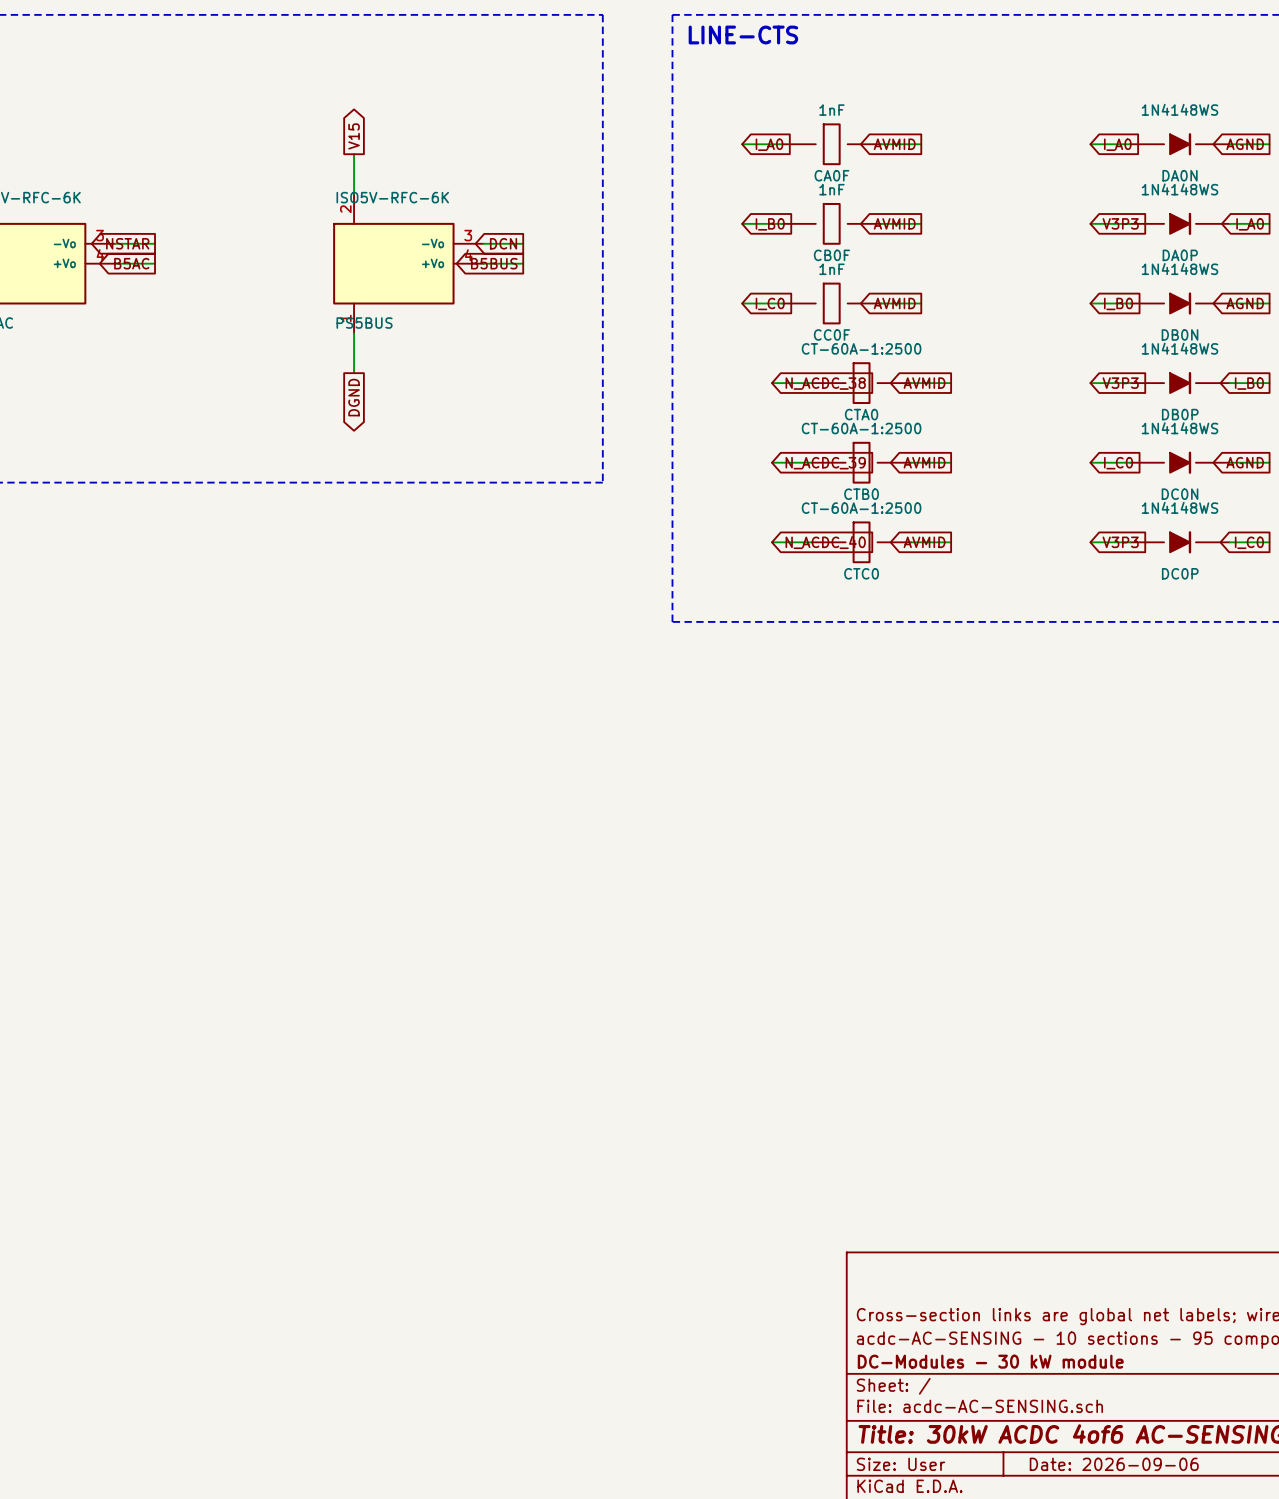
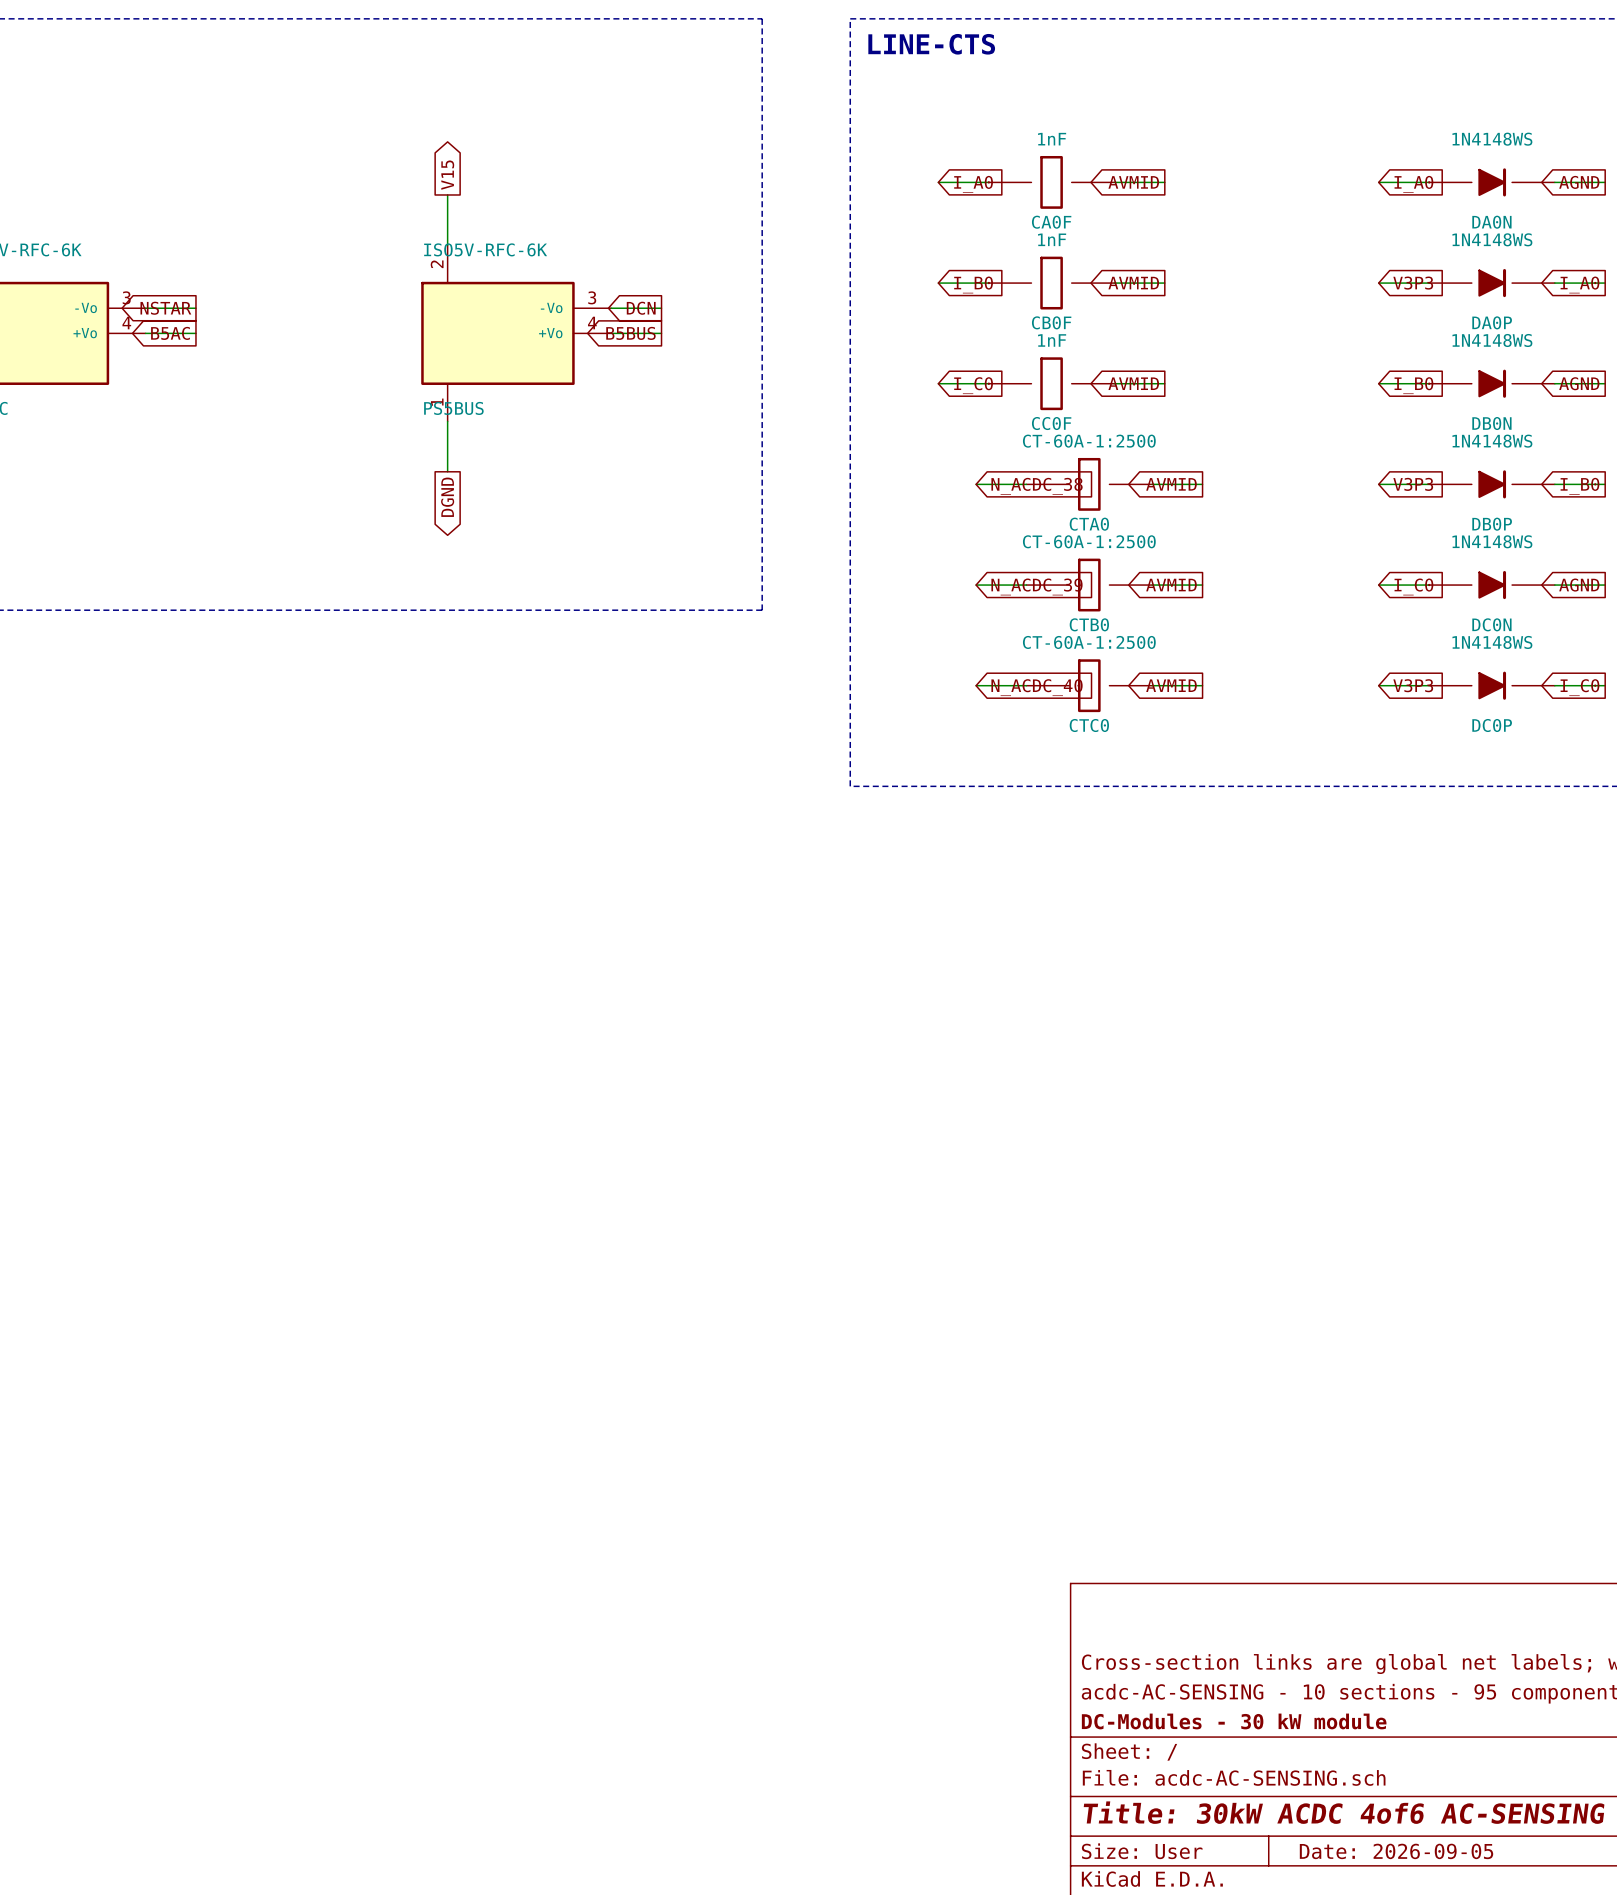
title block: Date: 2026-09-06 (1114, 1464) -> Date: 2026-09-05 (1396, 1851)

